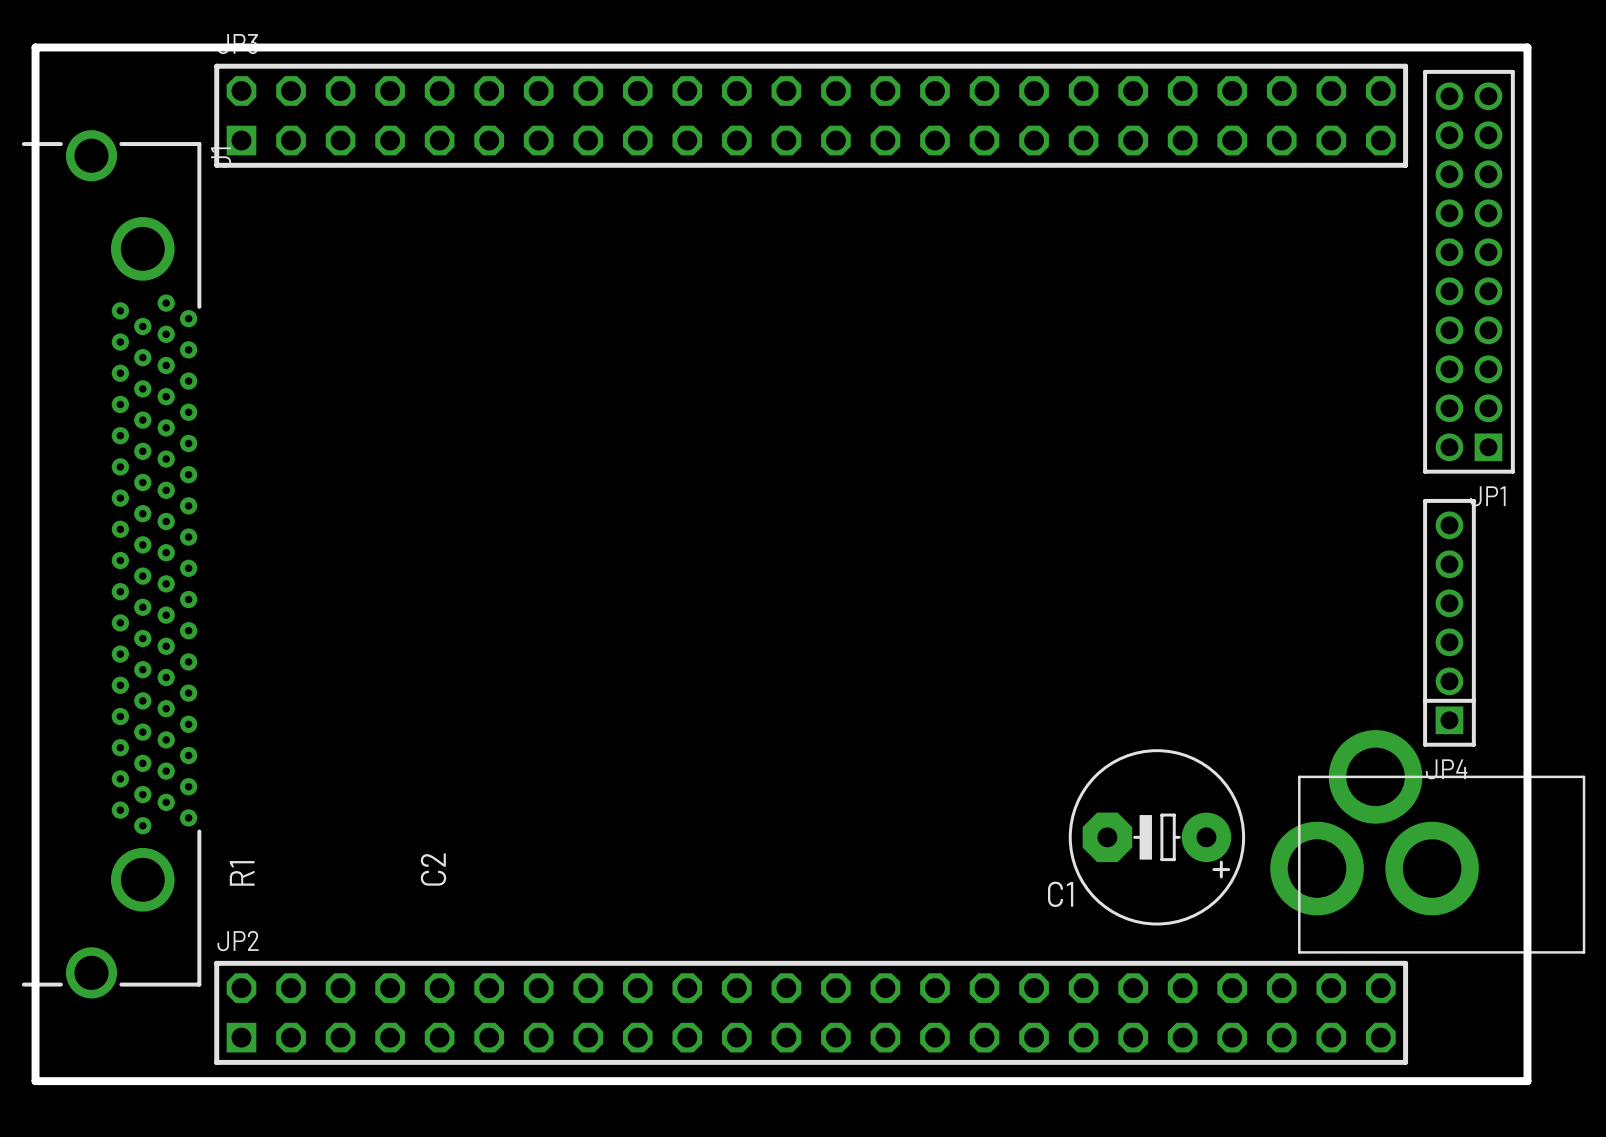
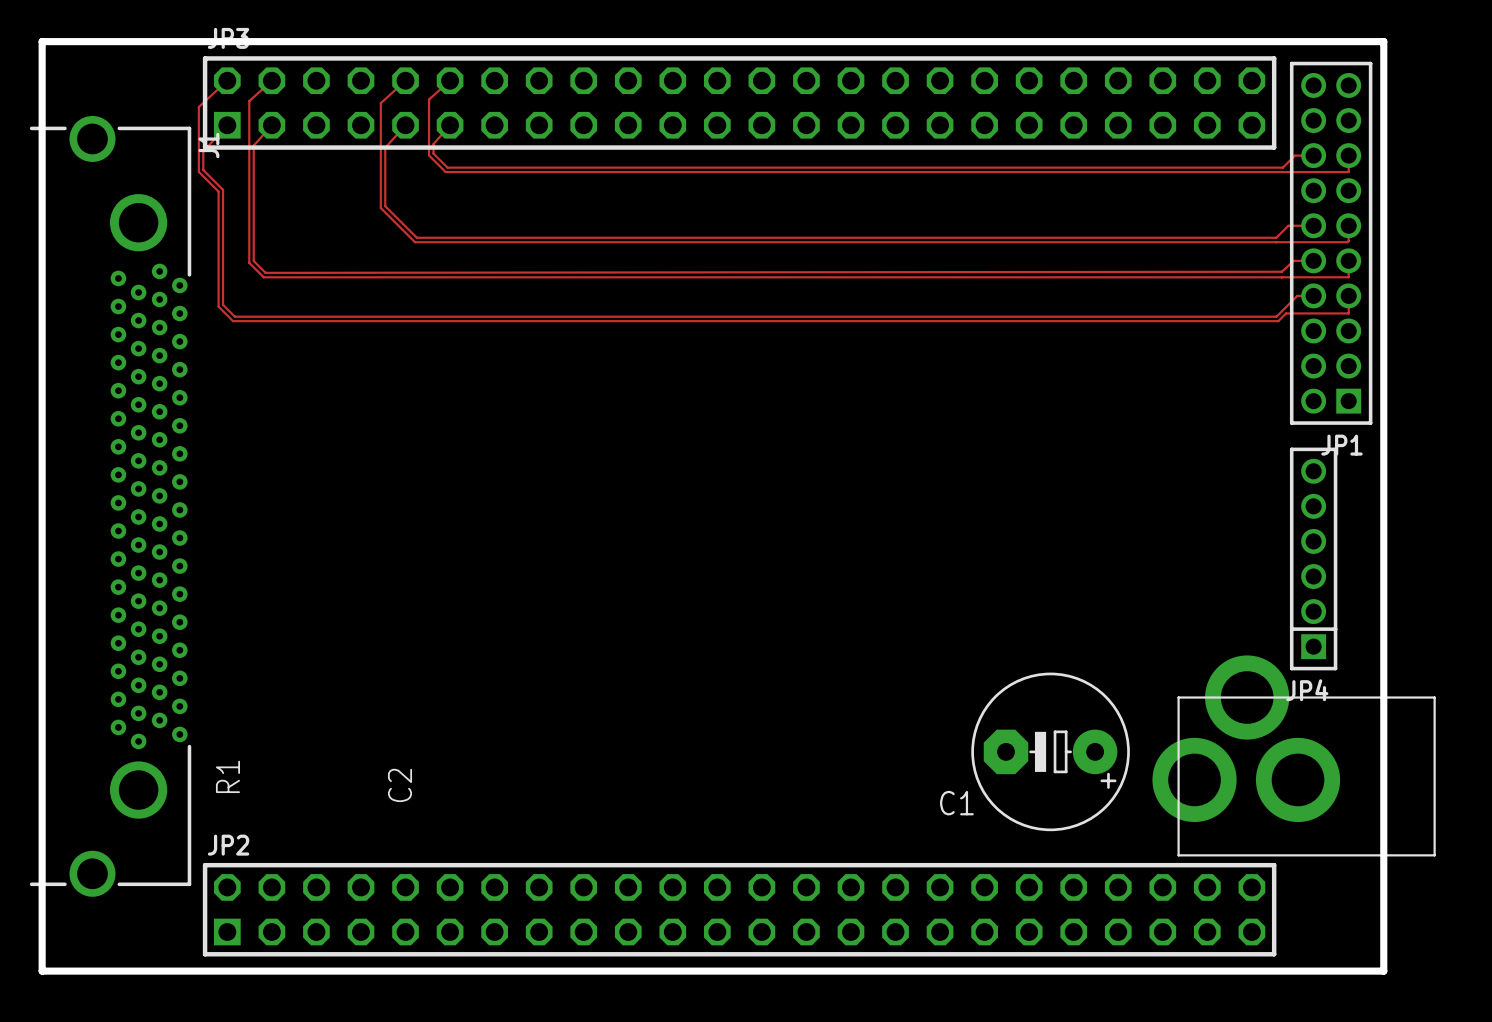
track: none -> (227, 80) (198, 106) (198, 171) (218, 191) (218, 306) (233, 321) (1278, 321) (1286, 313) (1348, 313) (1348, 295)
track: none -> (271, 80) (249, 101) (249, 262) (263, 277) (1348, 277) (1348, 260)
track: none -> (405, 80) (380, 103) (380, 208) (415, 242) (1347, 242) (1348, 225)
track: none -> (450, 80) (429, 99) (429, 155) (445, 172) (1348, 172) (1348, 155)
track: none -> (227, 125) (203, 151) (203, 170) (223, 189) (223, 304) (234, 316) (1276, 316) (1297, 295) (1313, 295)
track: none -> (271, 125) (253, 145) (253, 261) (265, 272) (1281, 271) (1293, 260) (1313, 260)
track: none -> (405, 125) (385, 147) (385, 206) (416, 237) (1276, 237) (1288, 225) (1313, 225)
track: none -> (450, 125) (433, 144) (433, 153) (447, 167) (1282, 167) (1294, 155) (1313, 155)

